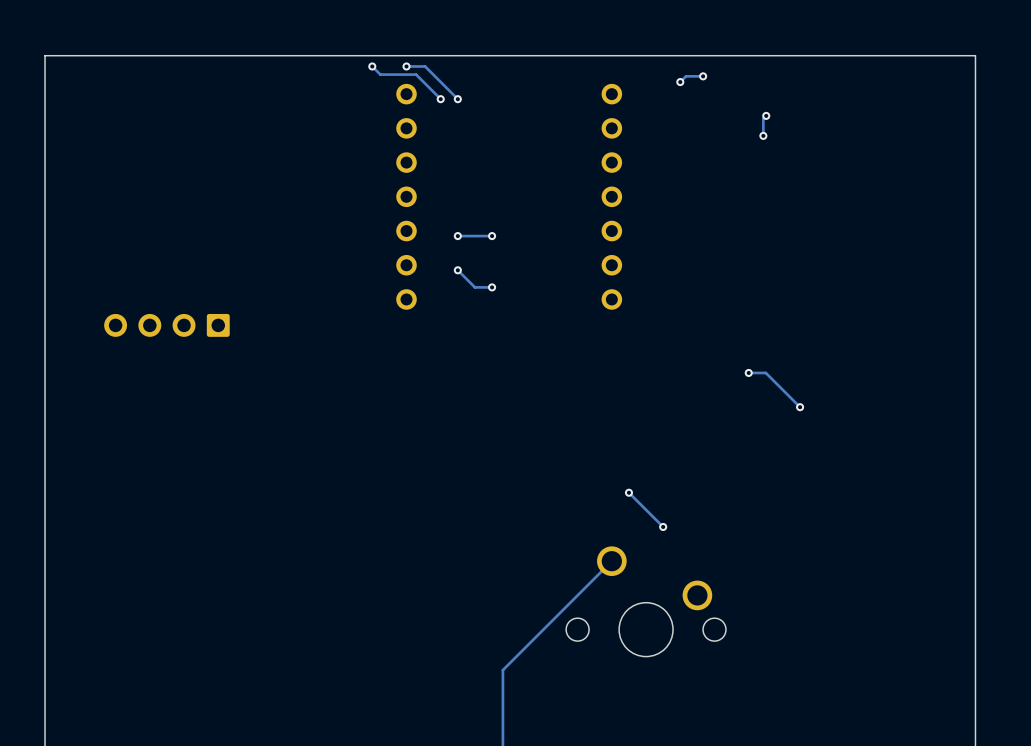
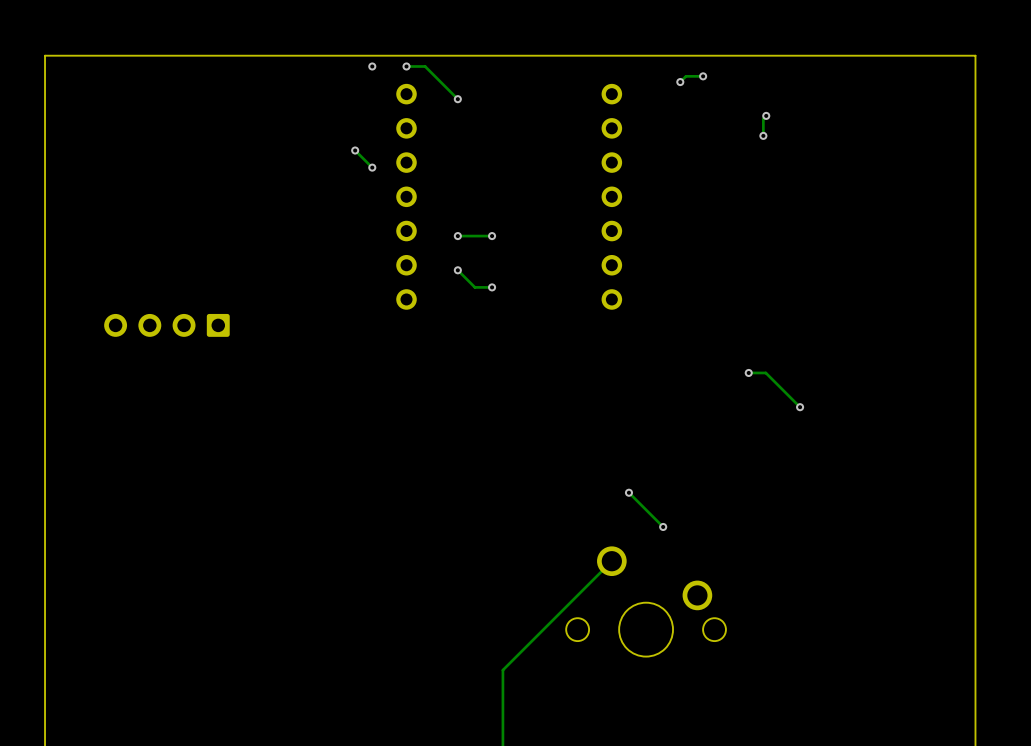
track: (372, 66) (380, 74) (416, 74) (440, 99) -> none
via: (440, 99) -> none
track: none -> (355, 150) (372, 167)
via: none -> (355, 150)
via: none -> (372, 167)

